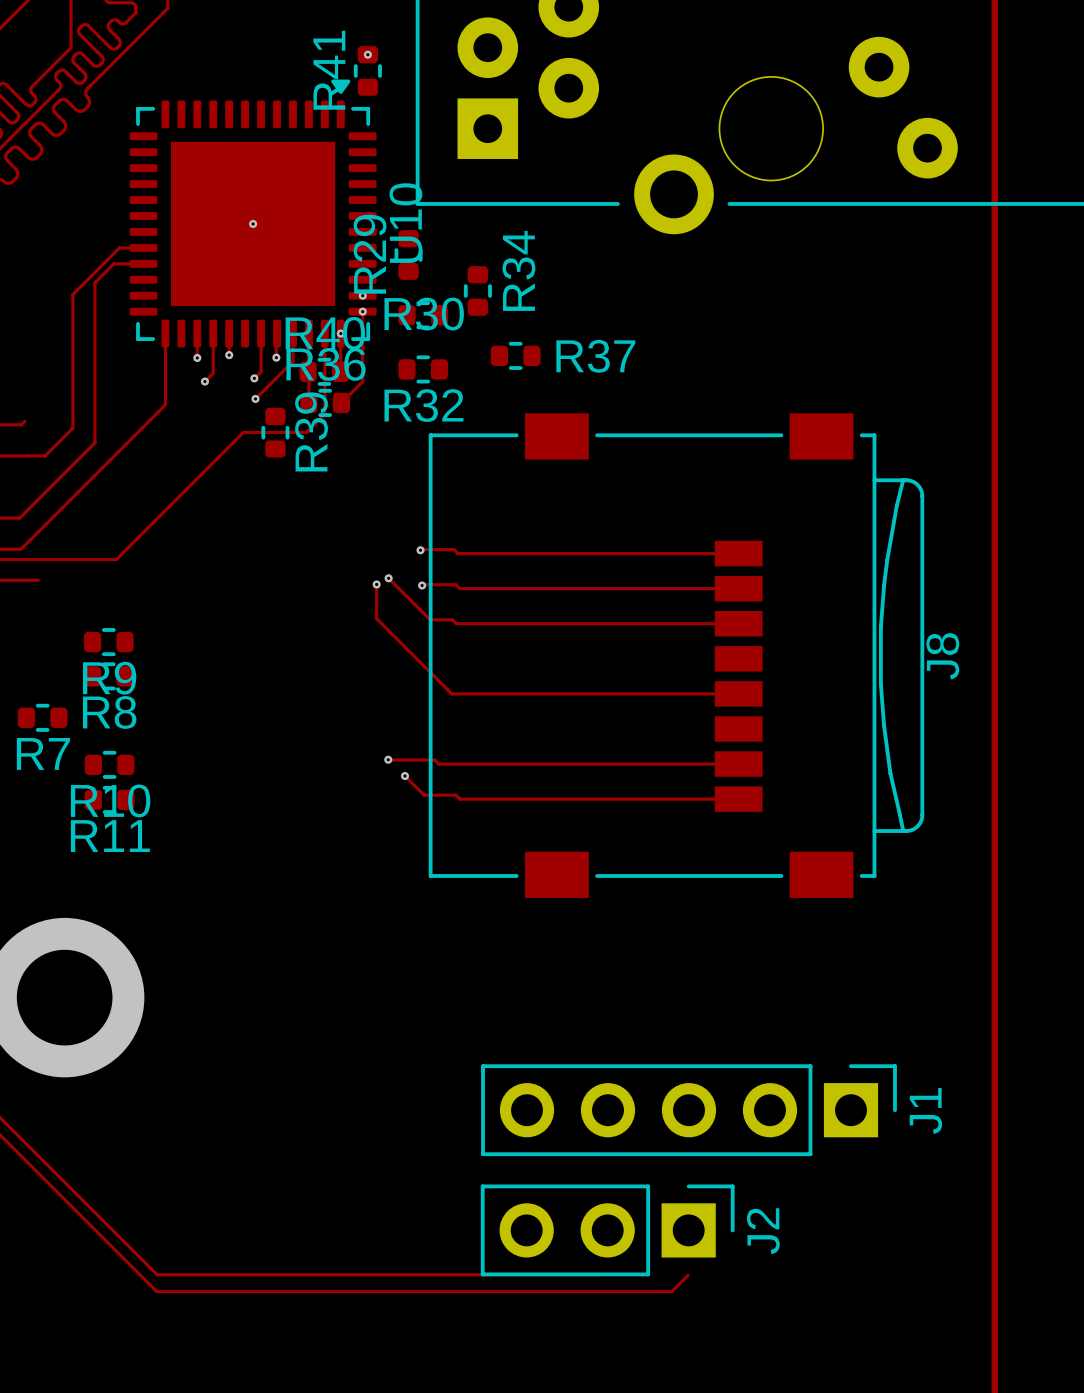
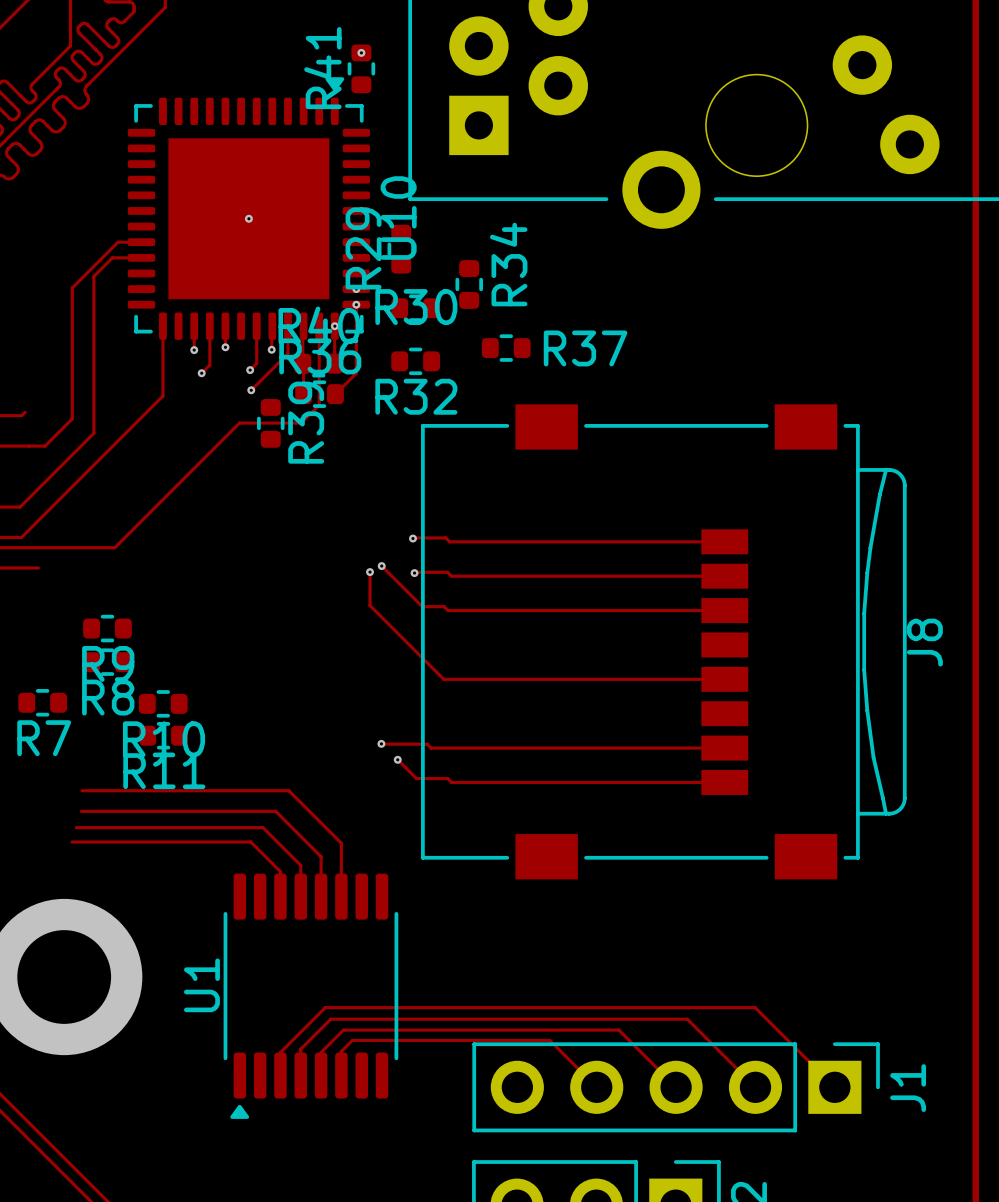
R10 position: (109, 764) -> (163, 703)
R11 position: (109, 799) -> (163, 735)
track: none -> (82, 790) (288, 790) (341, 843) (341, 896)
track: none -> (81, 811) (275, 811) (321, 856) (321, 896)
track: none -> (76, 827) (262, 827) (300, 865) (300, 896)
track: none -> (72, 842) (250, 842) (280, 871) (280, 896)
U1: none -> (310, 996)
track: none -> (280, 1075) (280, 1052) (325, 1007) (755, 1007) (834, 1087)
track: none -> (300, 1075) (300, 1049) (330, 1019) (687, 1019) (755, 1087)
track: none -> (321, 1075) (321, 1052) (343, 1030) (618, 1030) (676, 1087)
track: none -> (341, 1075) (341, 1051) (352, 1040) (549, 1040) (596, 1087)

